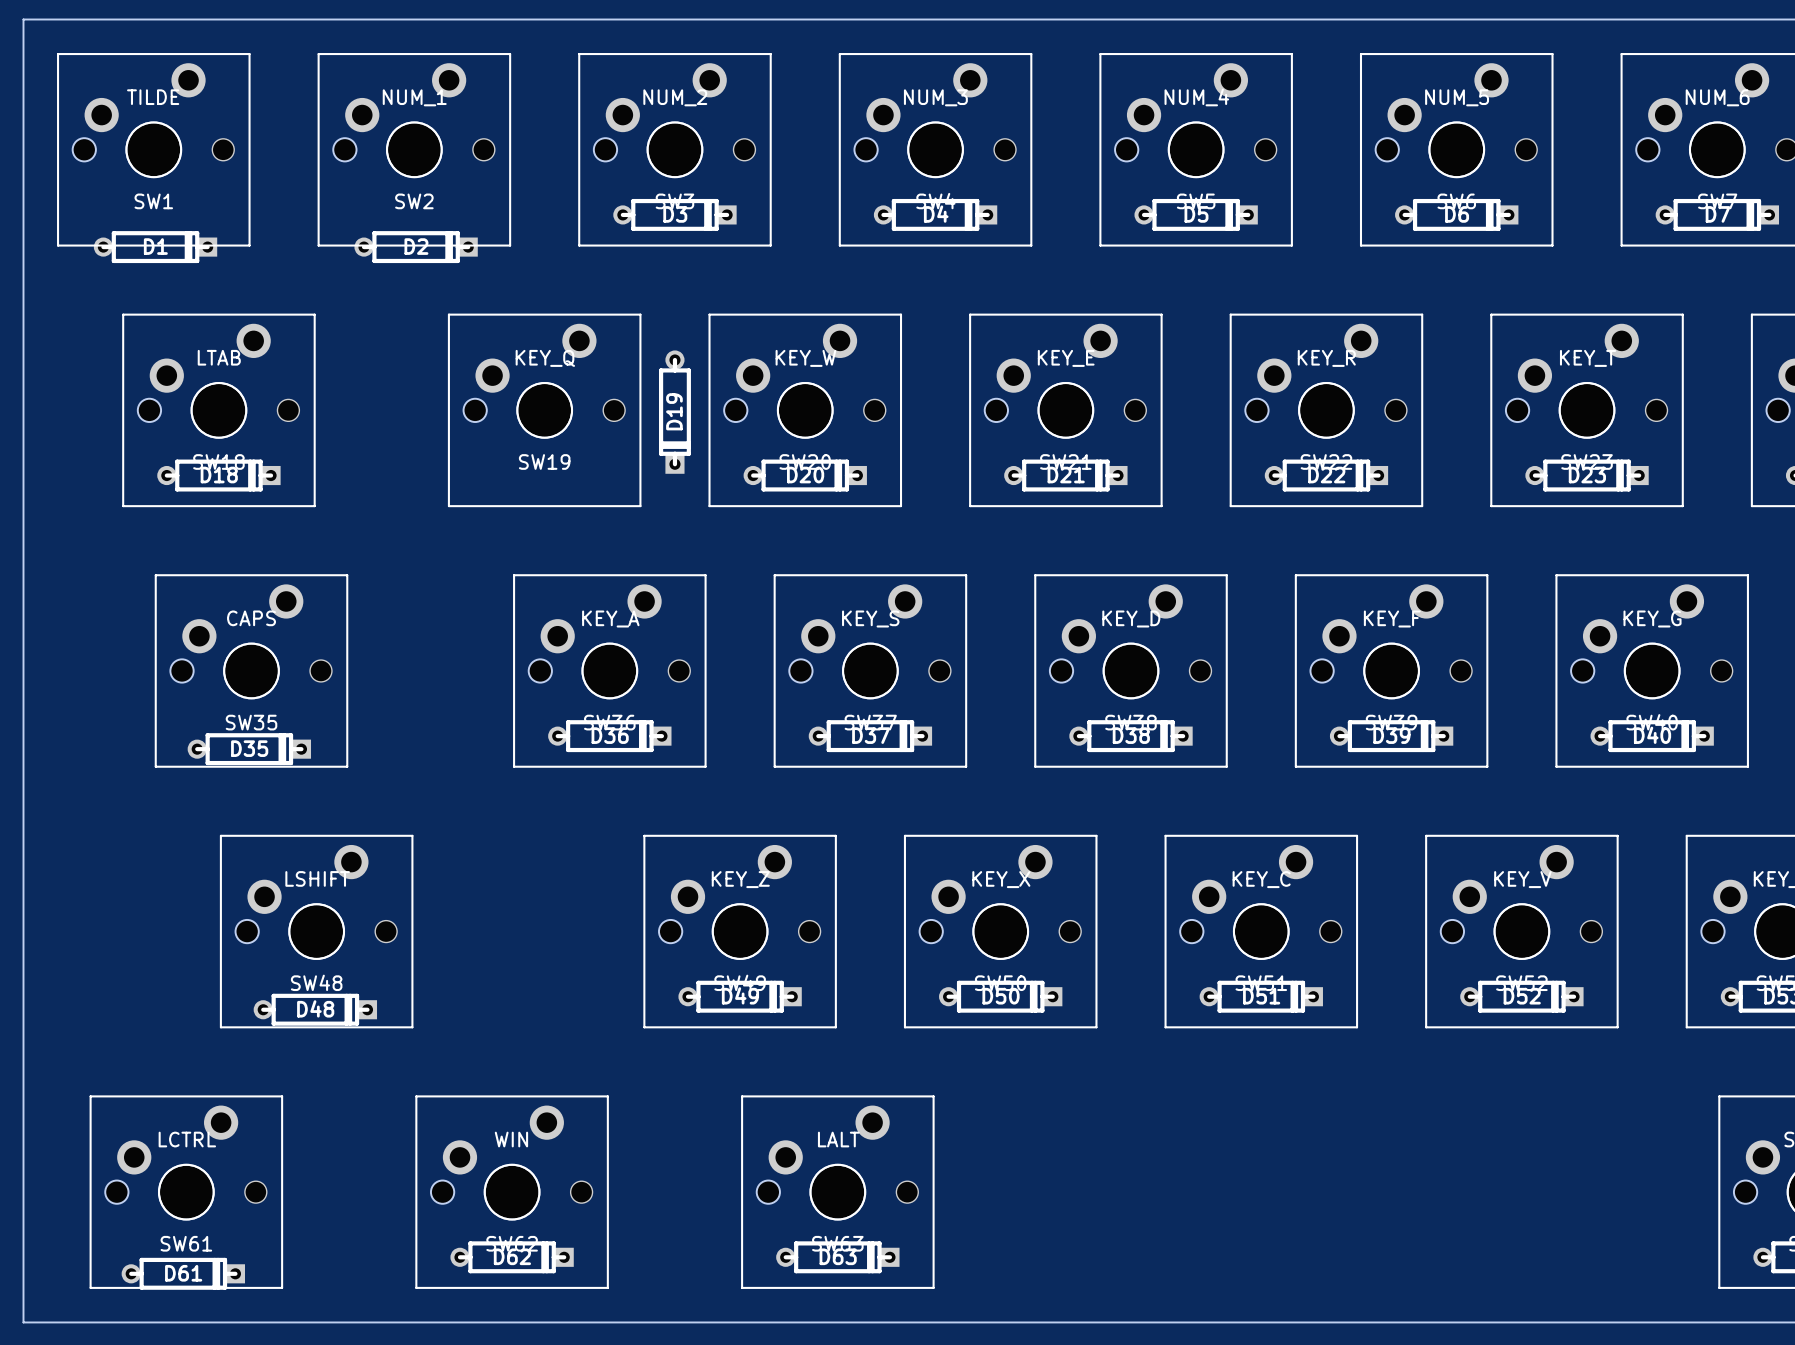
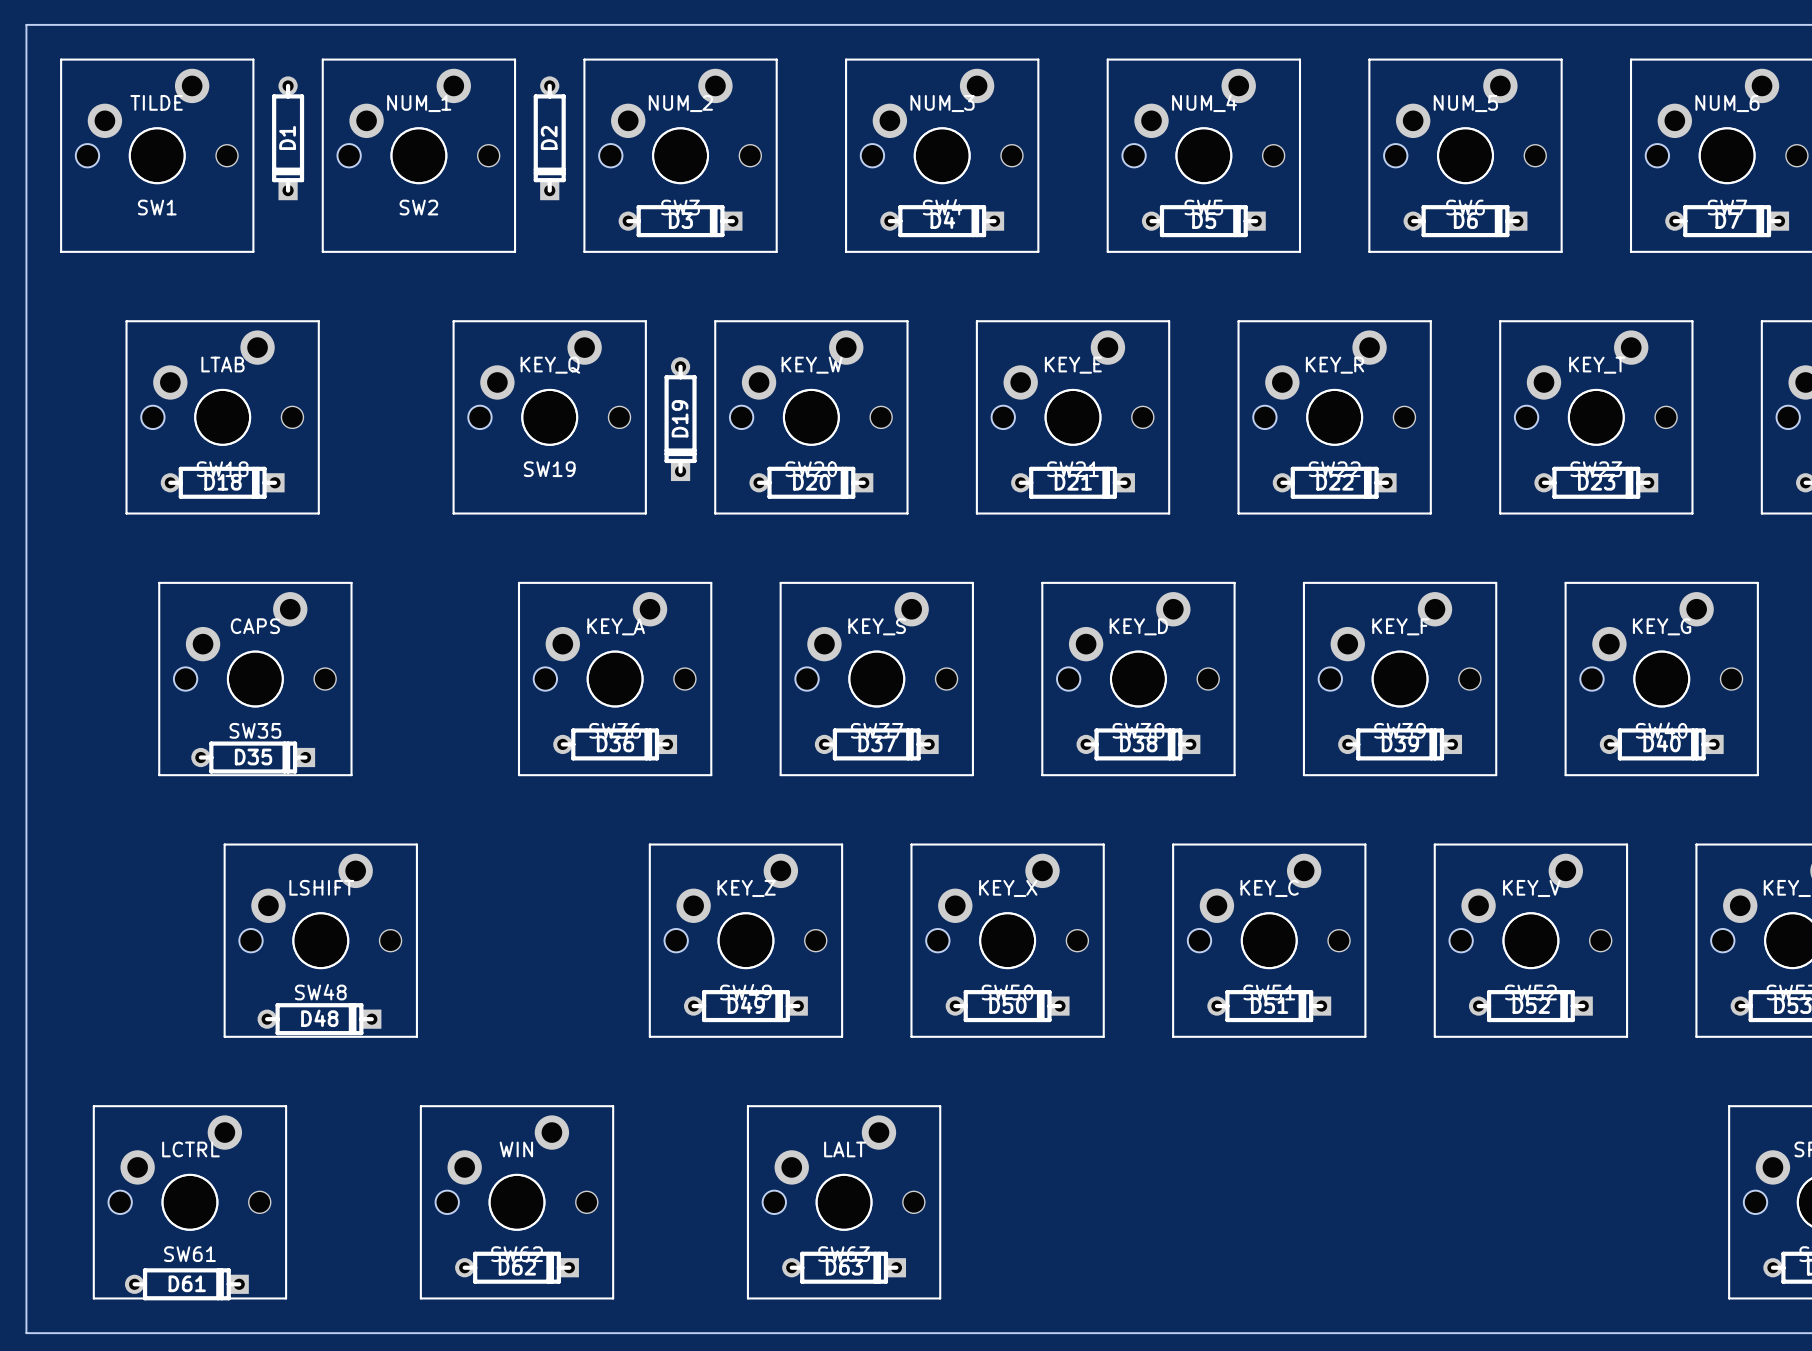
D1 rotation: 0° (155, 247) -> 90° clockwise (288, 138)
D1 position: (155, 247) -> (288, 138)
D2 rotation: 0° (416, 247) -> 90° clockwise (549, 138)
D2 position: (416, 247) -> (549, 138)

